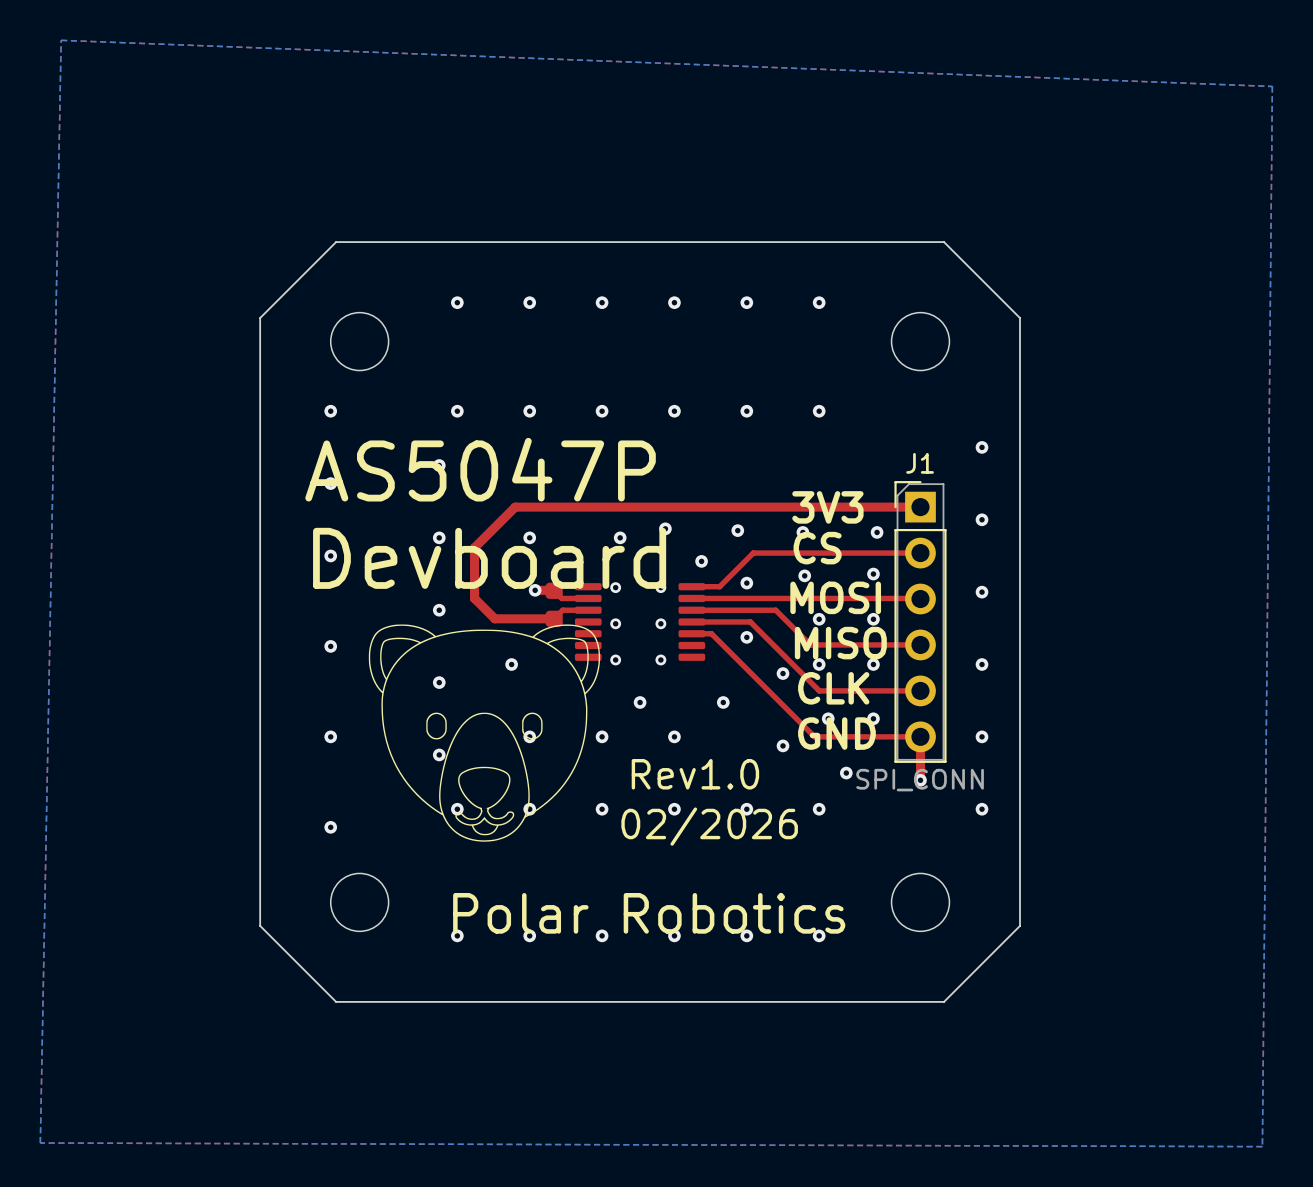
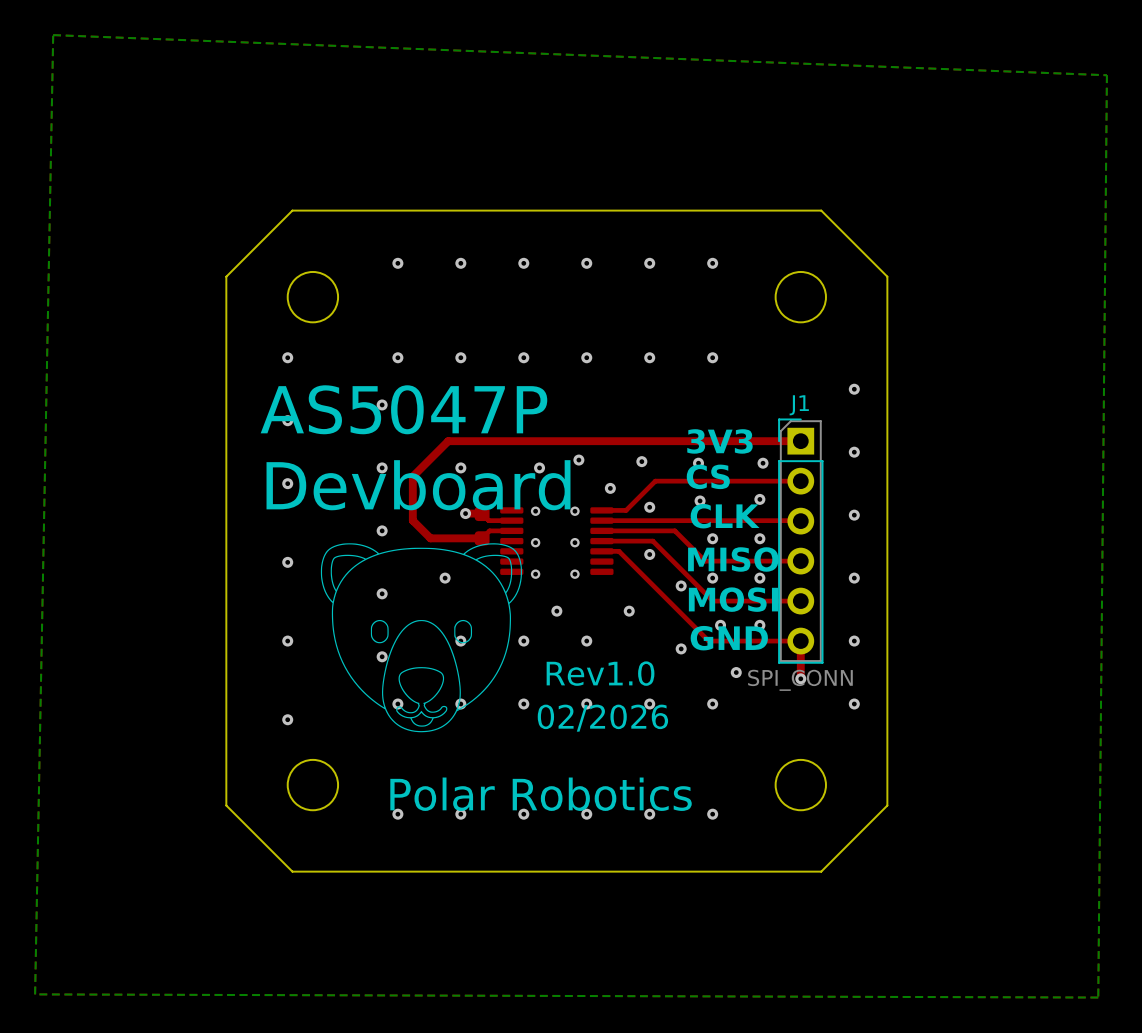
text position: MOSI (835, 597) -> MOSI (733, 599)
text position: CLK (833, 688) -> CLK (725, 516)

